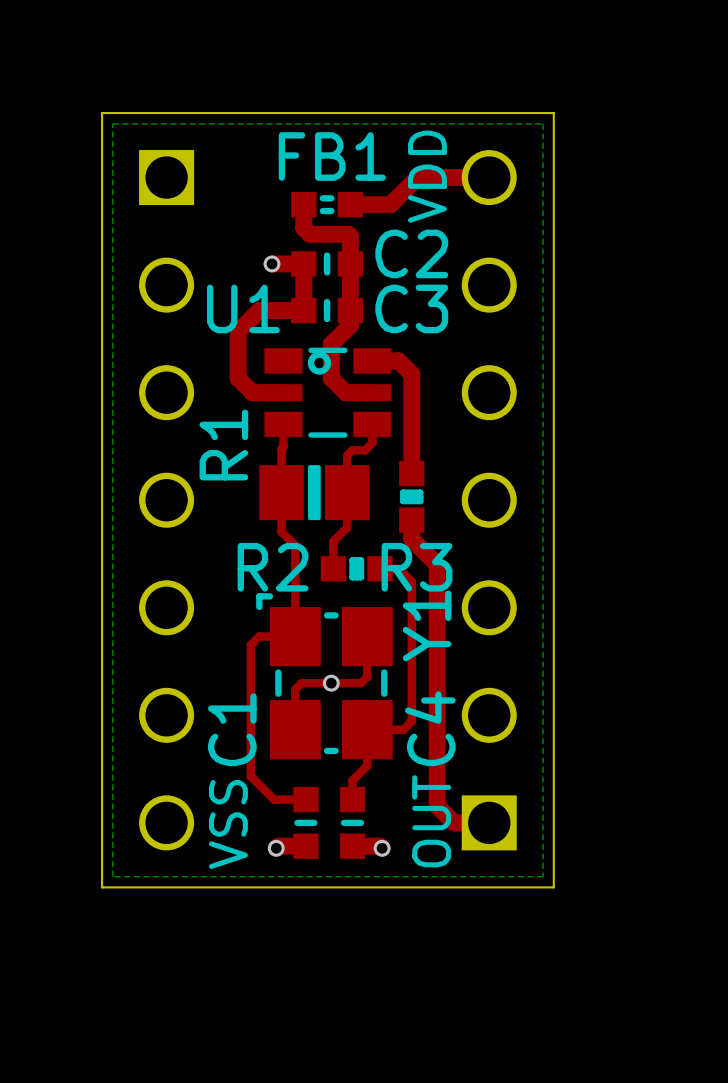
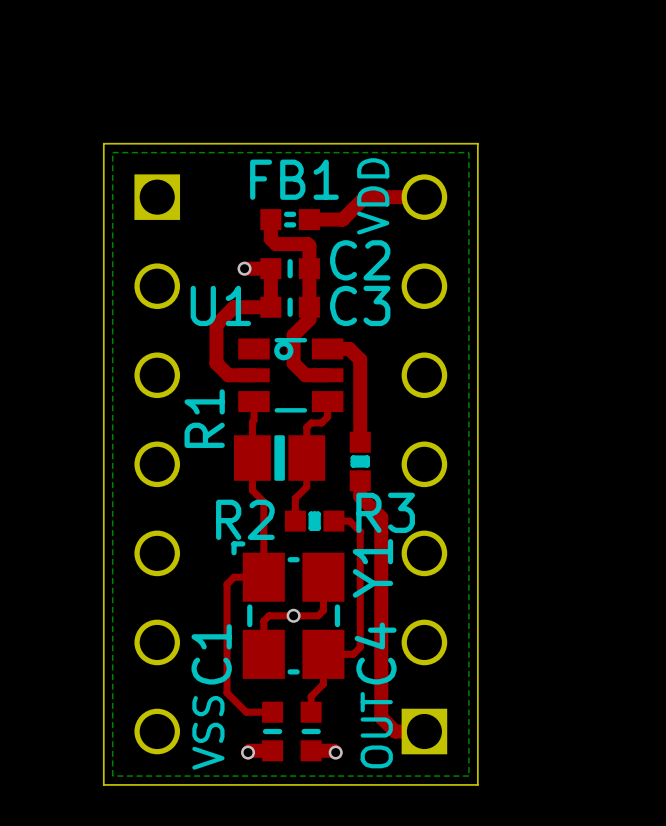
R3 name position: R3 (417, 567) -> R3 (385, 512)

